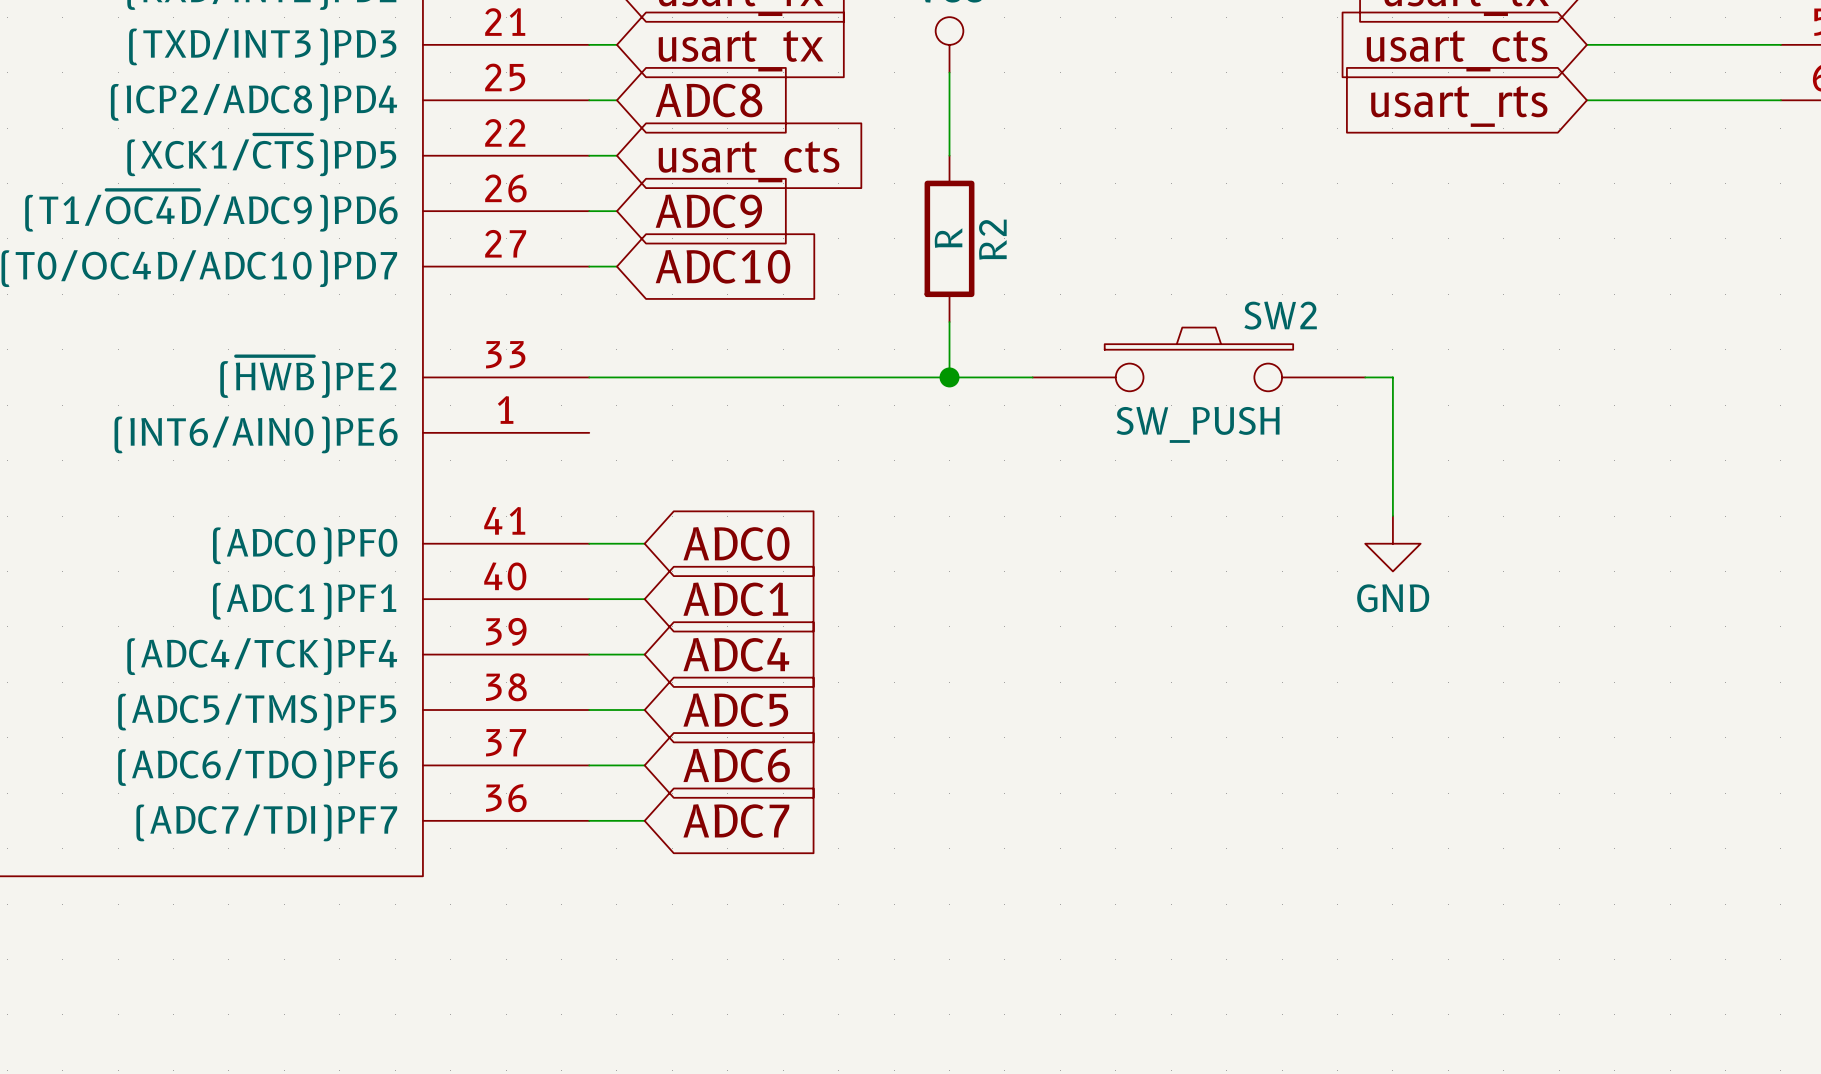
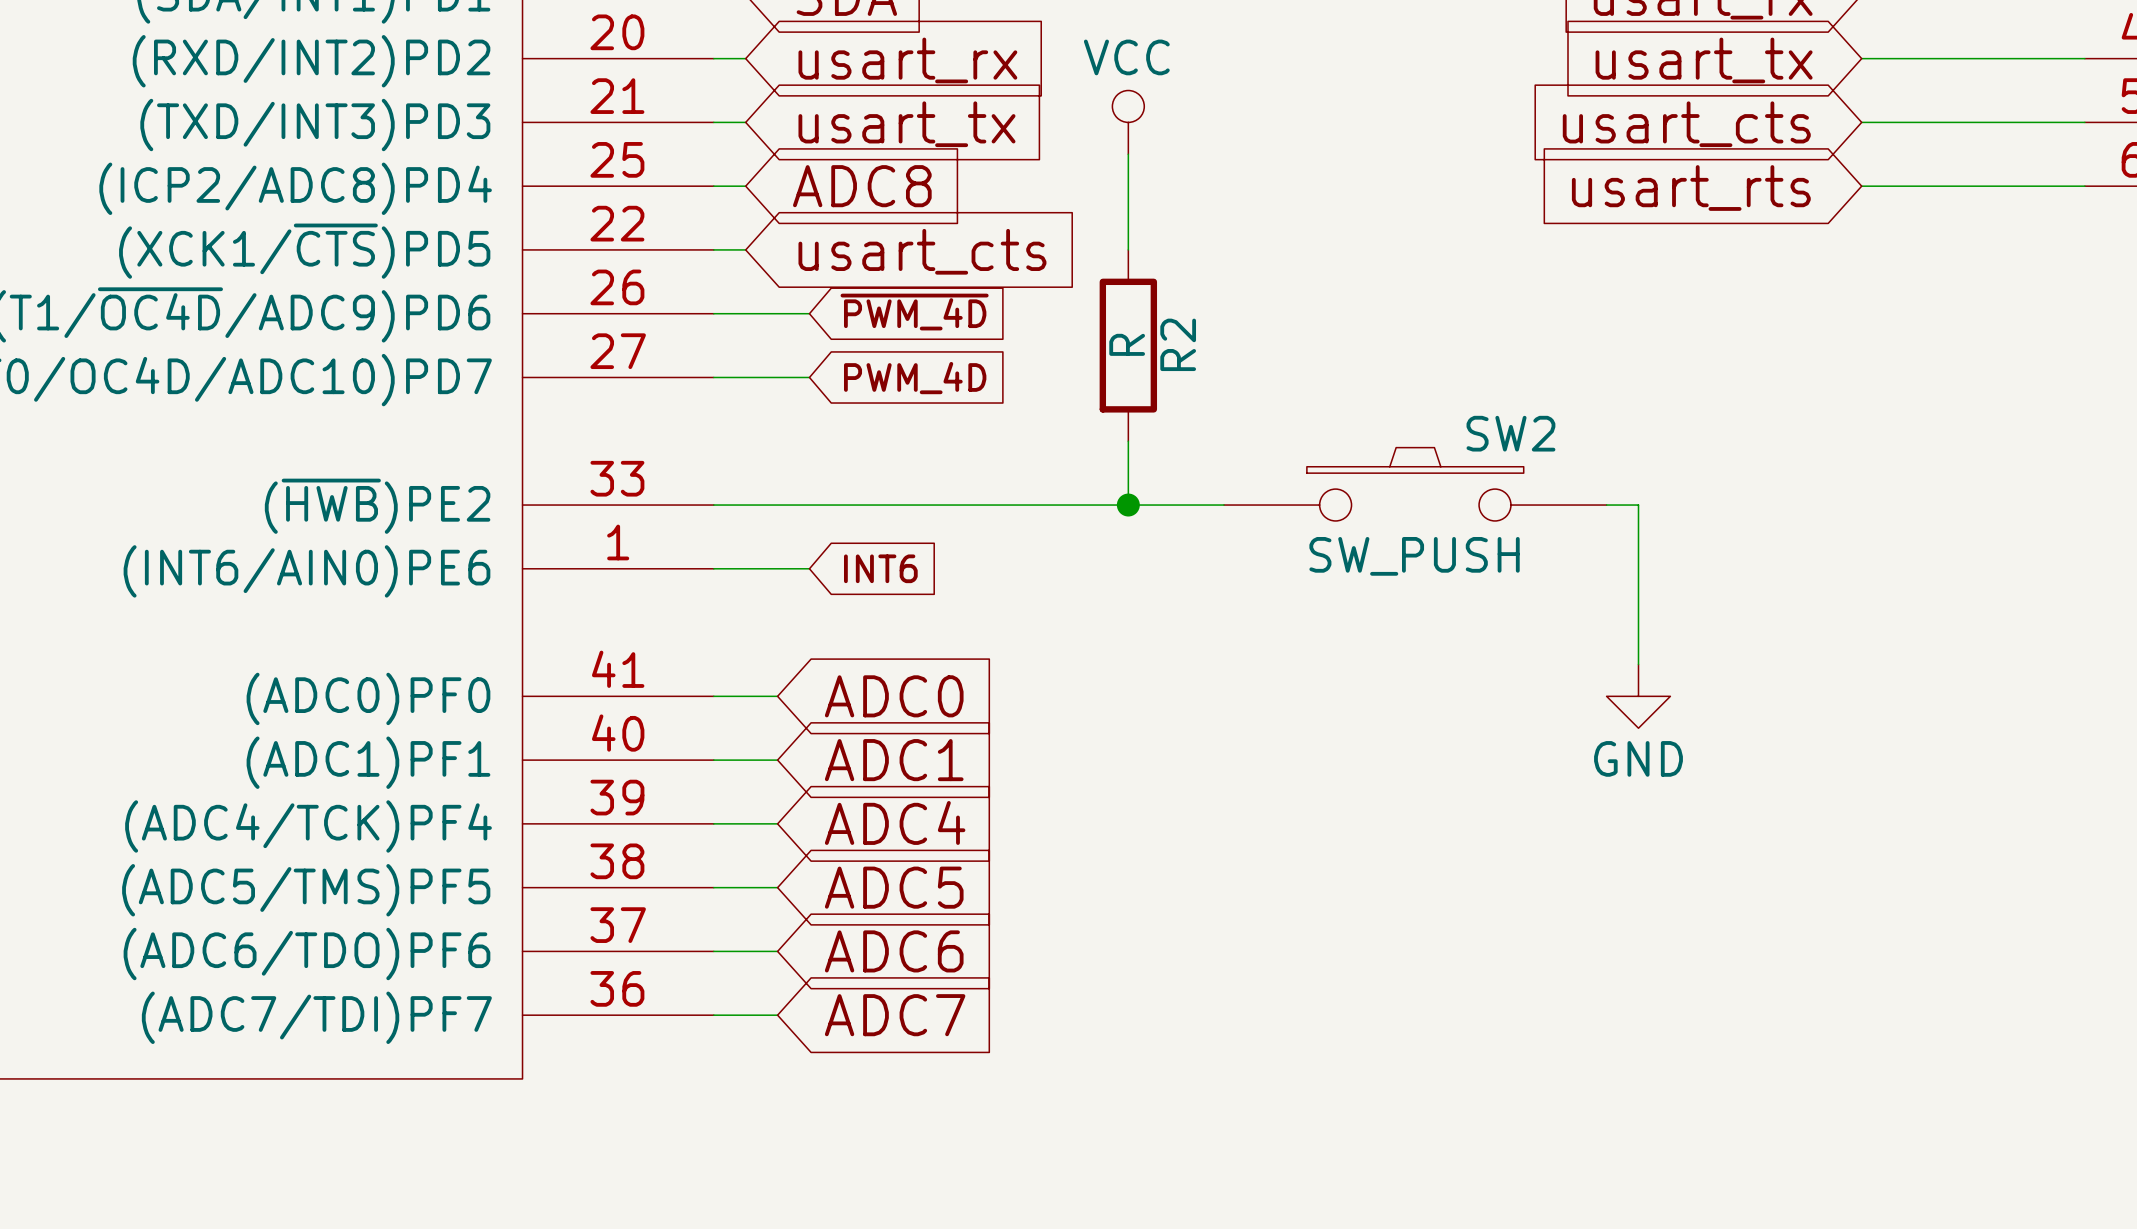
wire: none -> (745, 313) (809, 313)
global label: ADC9 (708, 211) -> none
global label: none -> ~{PWM_4D} (914, 312)
wire: none -> (745, 377) (809, 377)
global label: ADC10 (722, 266) -> none
global label: none -> PWM_4D (915, 378)
wire: none -> (713, 568) (809, 568)
global label: none -> INT6 (880, 568)

